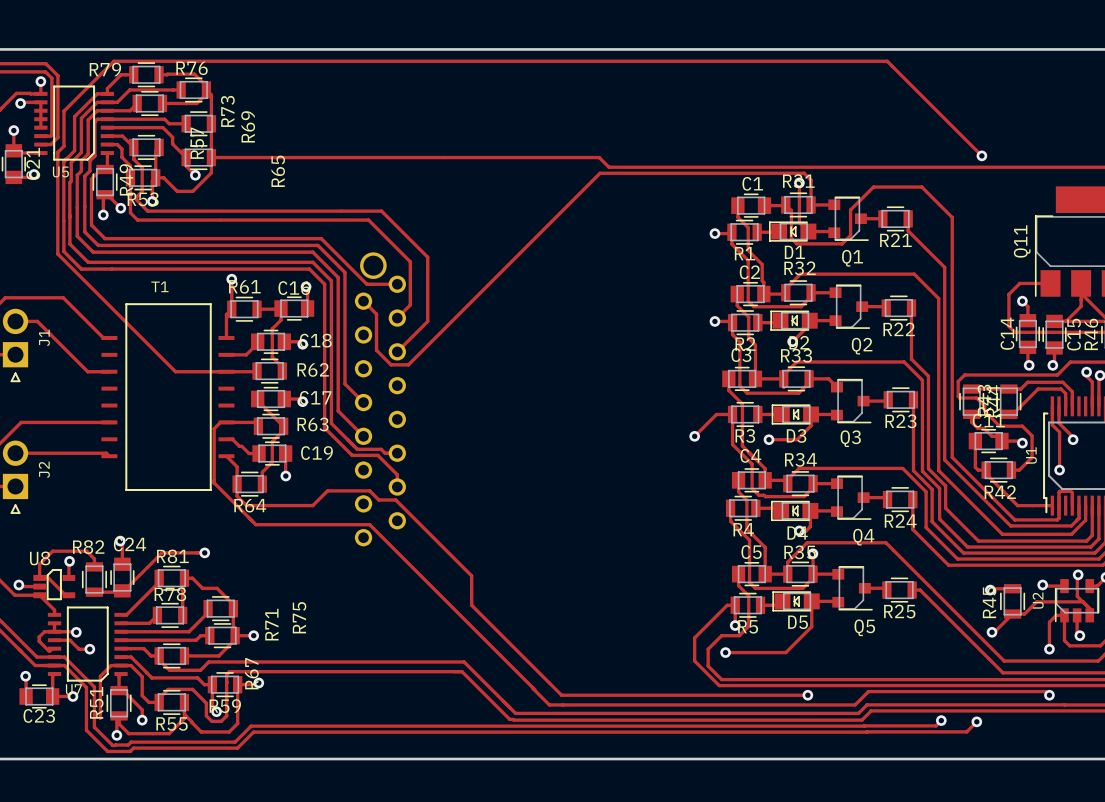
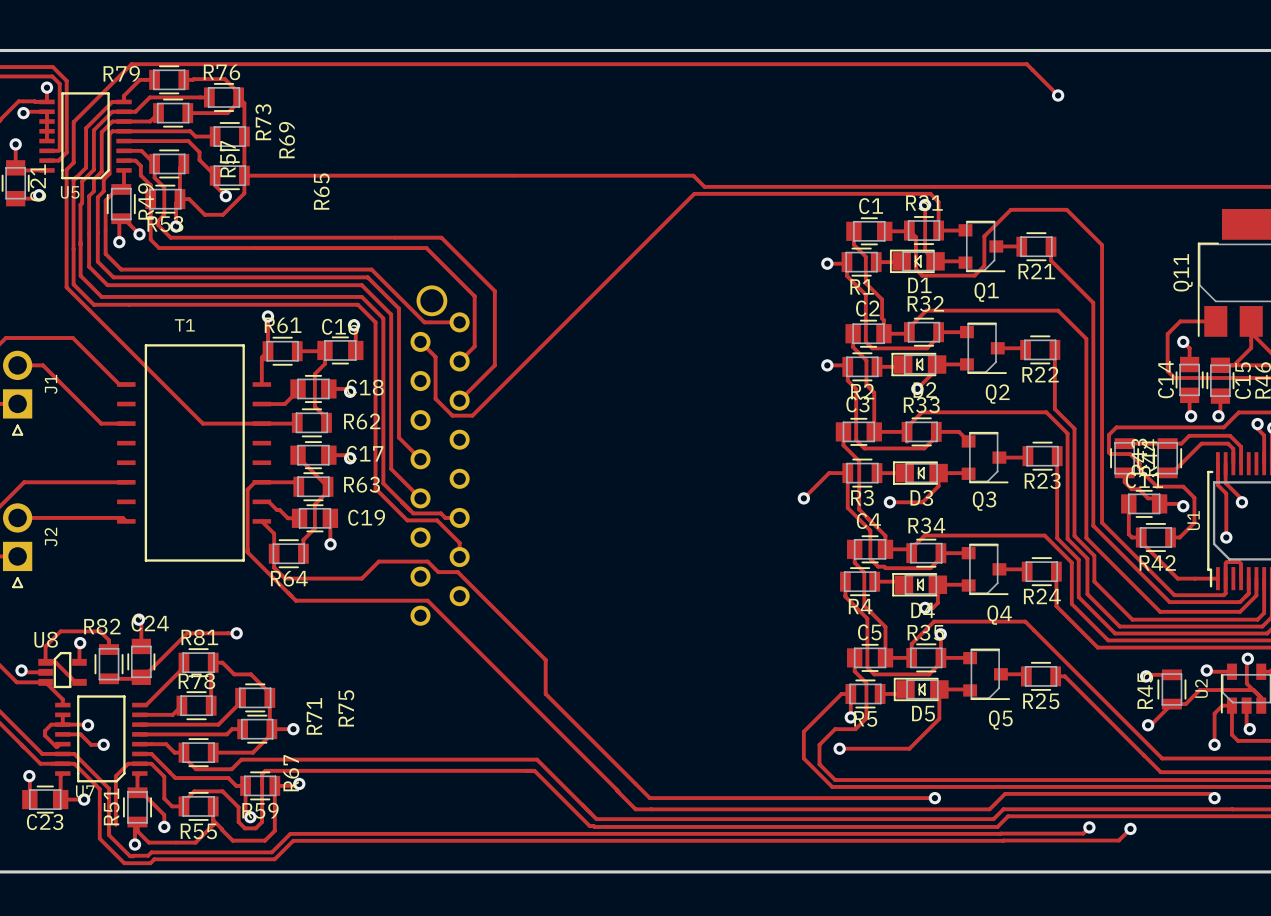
track: (914, 88) (981, 155) -> none
via: none -> (1058, 95)
via: (981, 155) -> none

